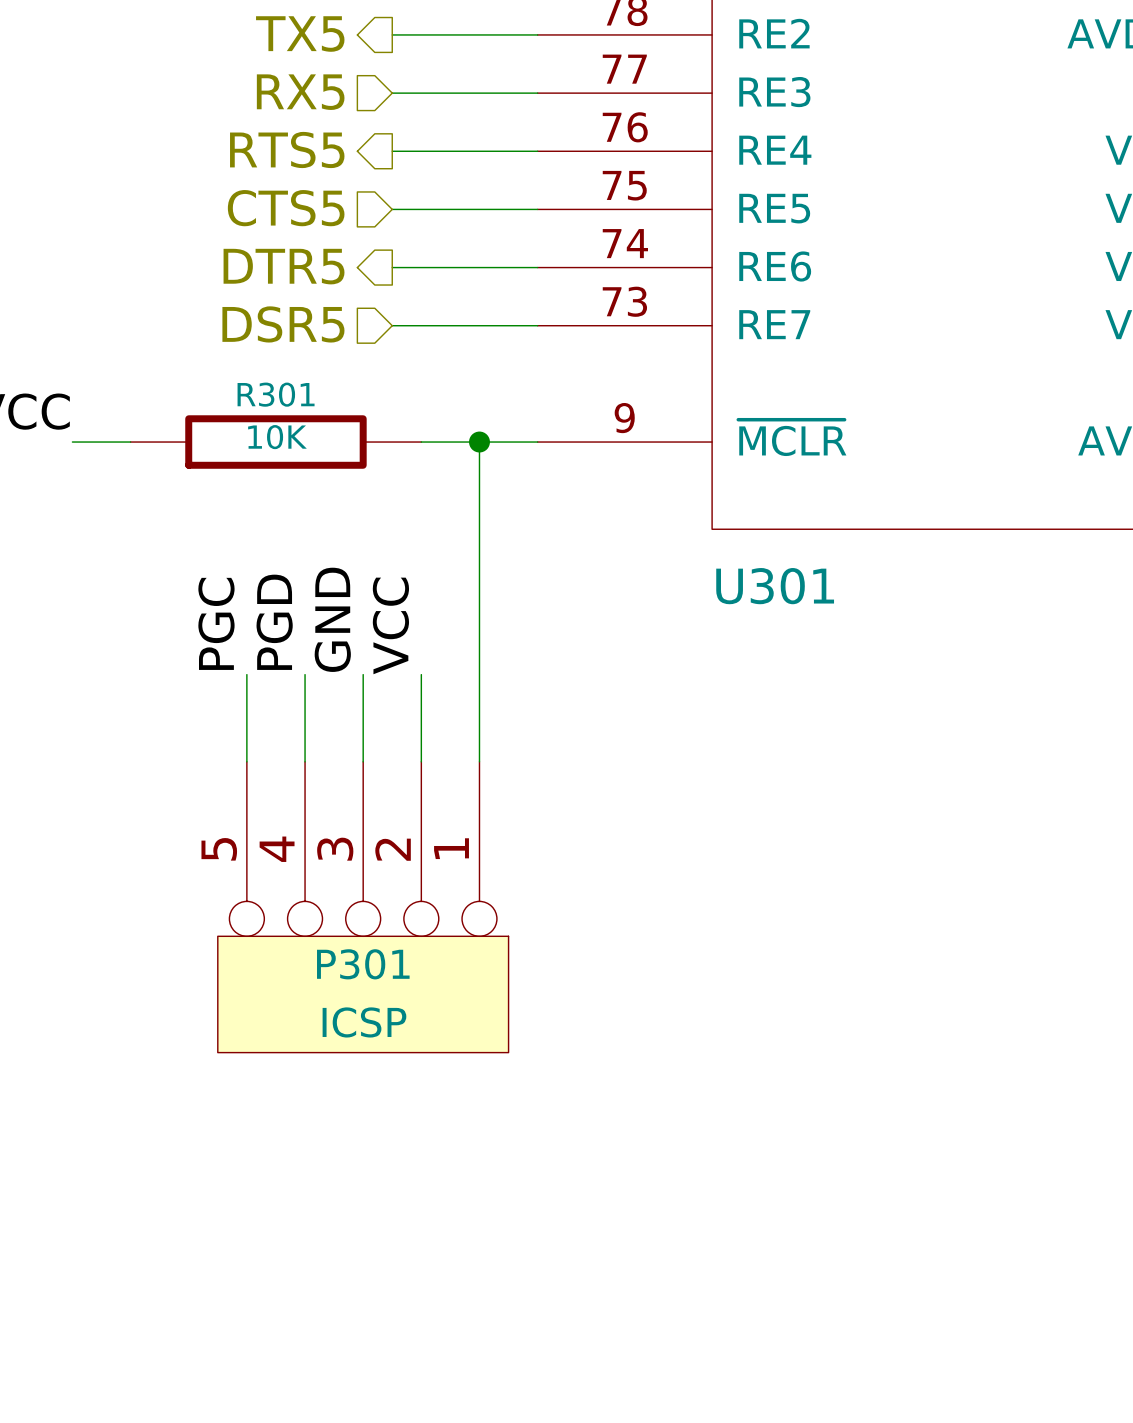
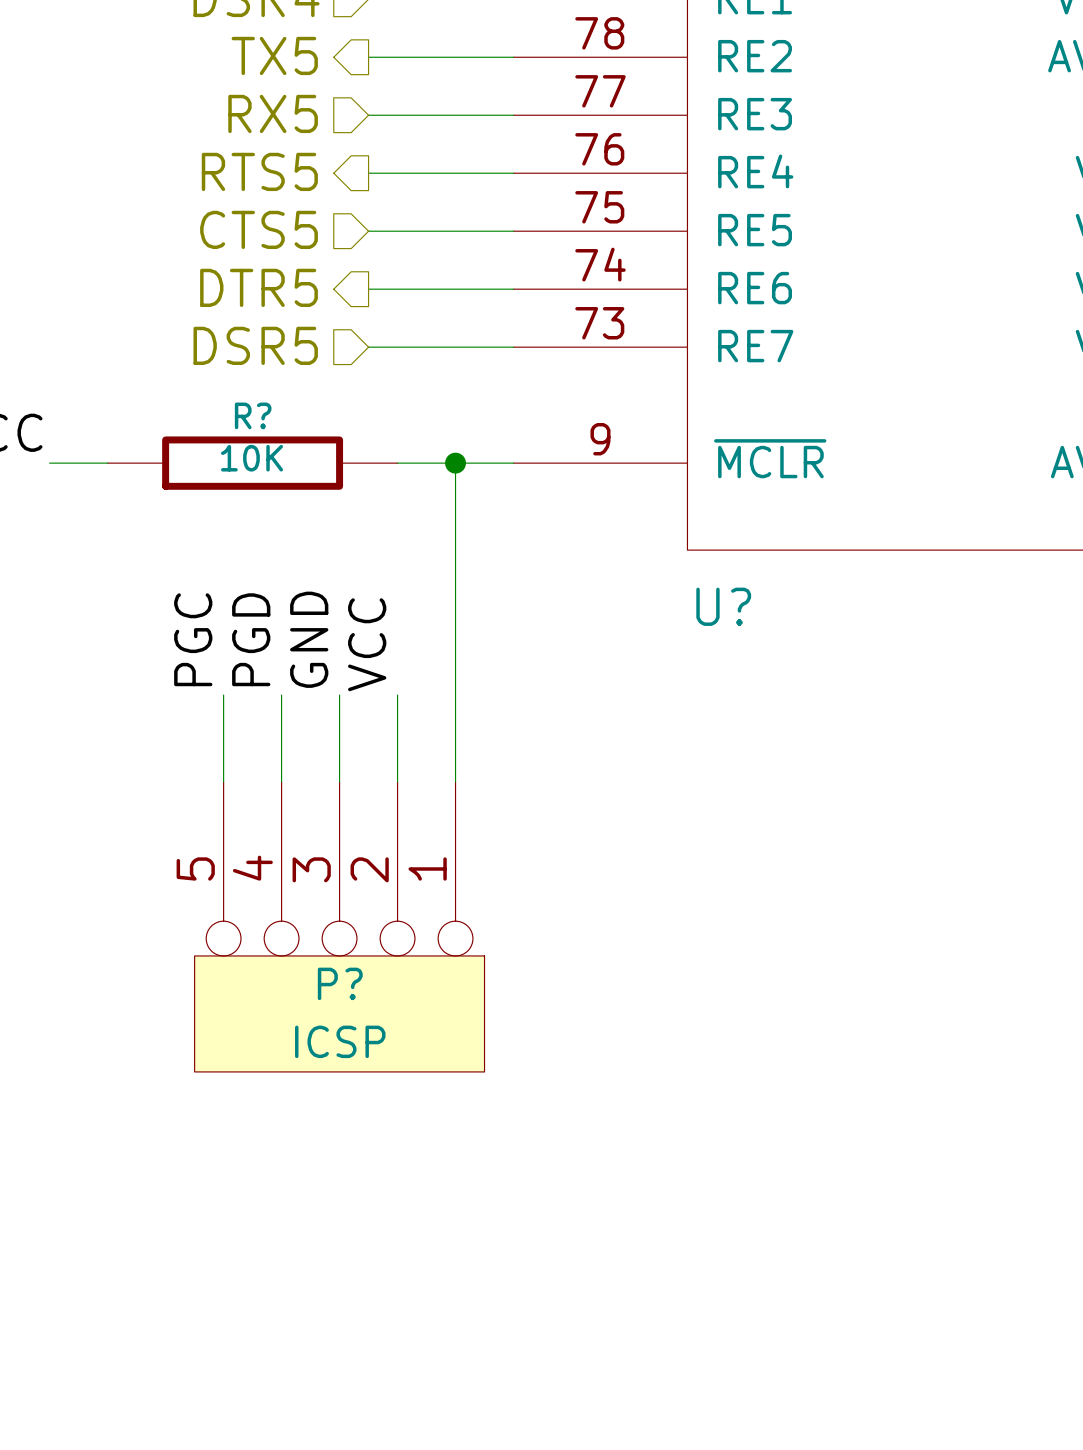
R301 name: R301 (276, 394) -> R? (253, 415)
U301 name: U301 (775, 586) -> U? (723, 606)
P301 name: P301 (363, 964) -> P? (340, 983)

